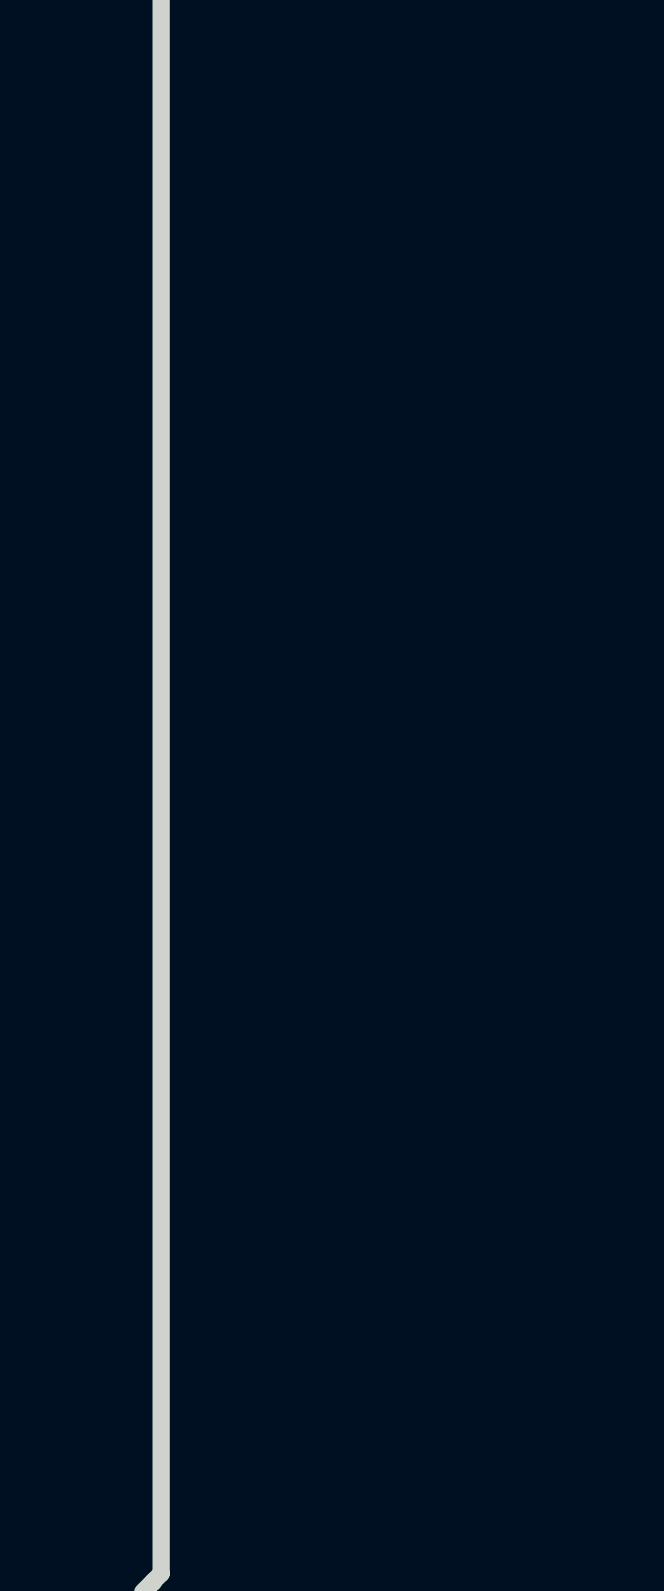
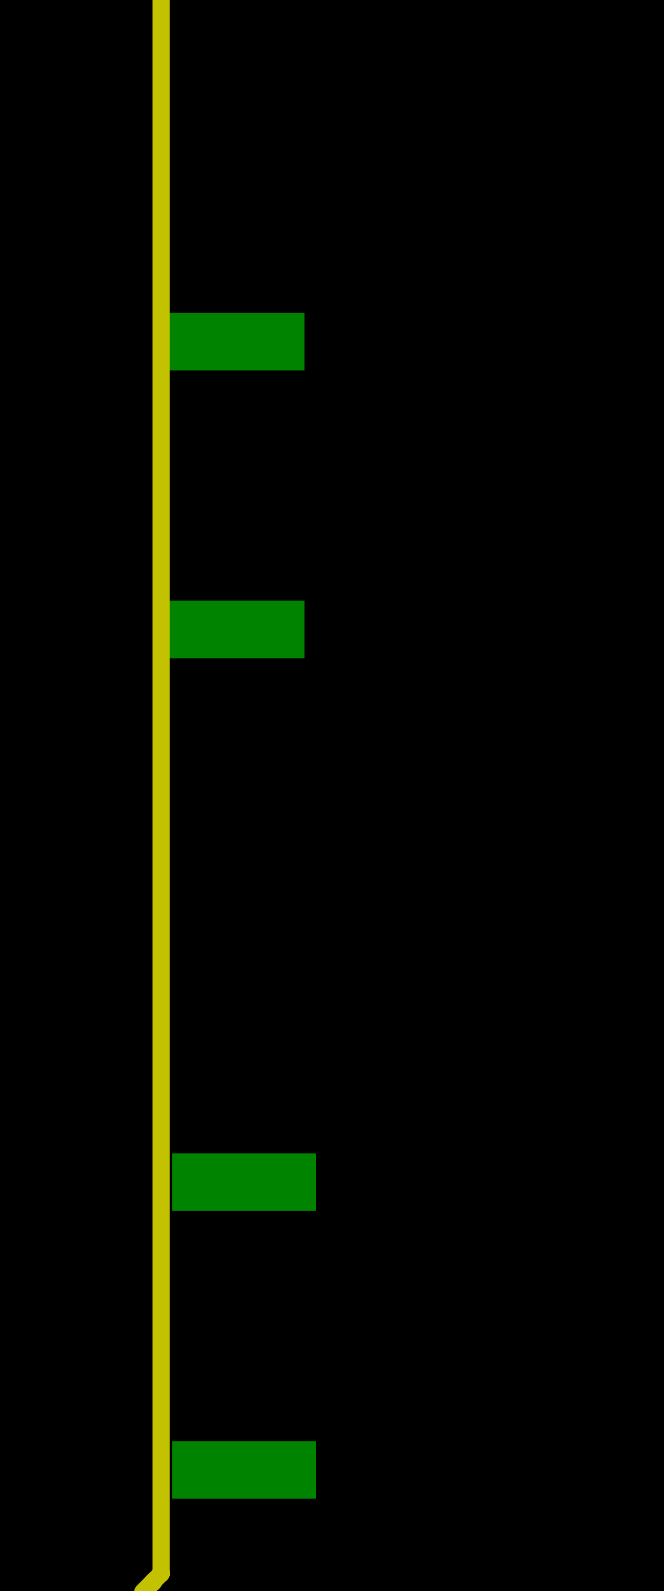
part: none -> (232, 485)
part: none -> (244, 1326)

